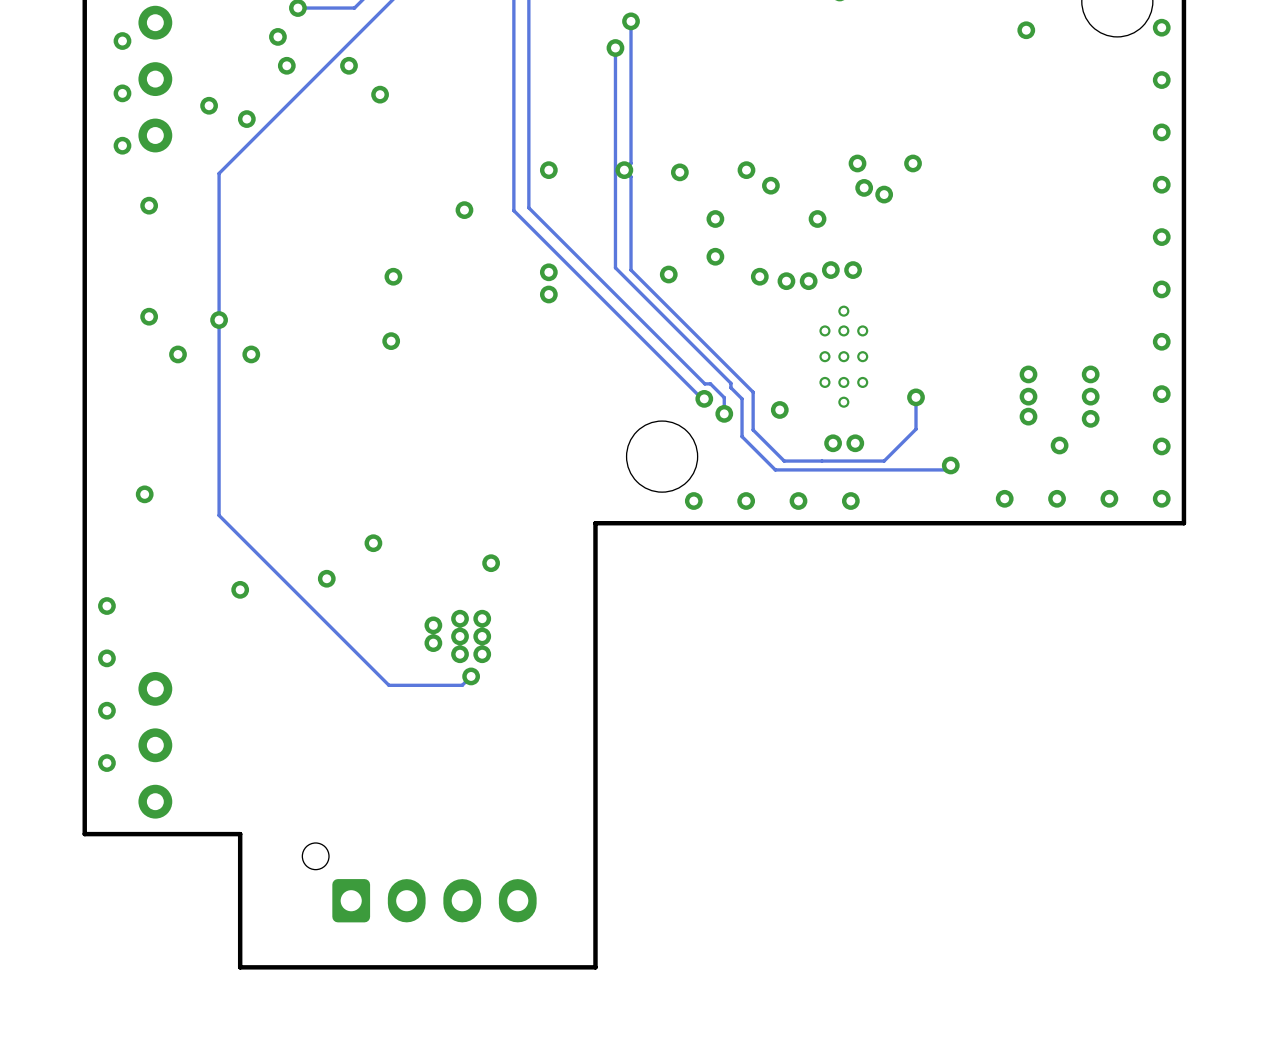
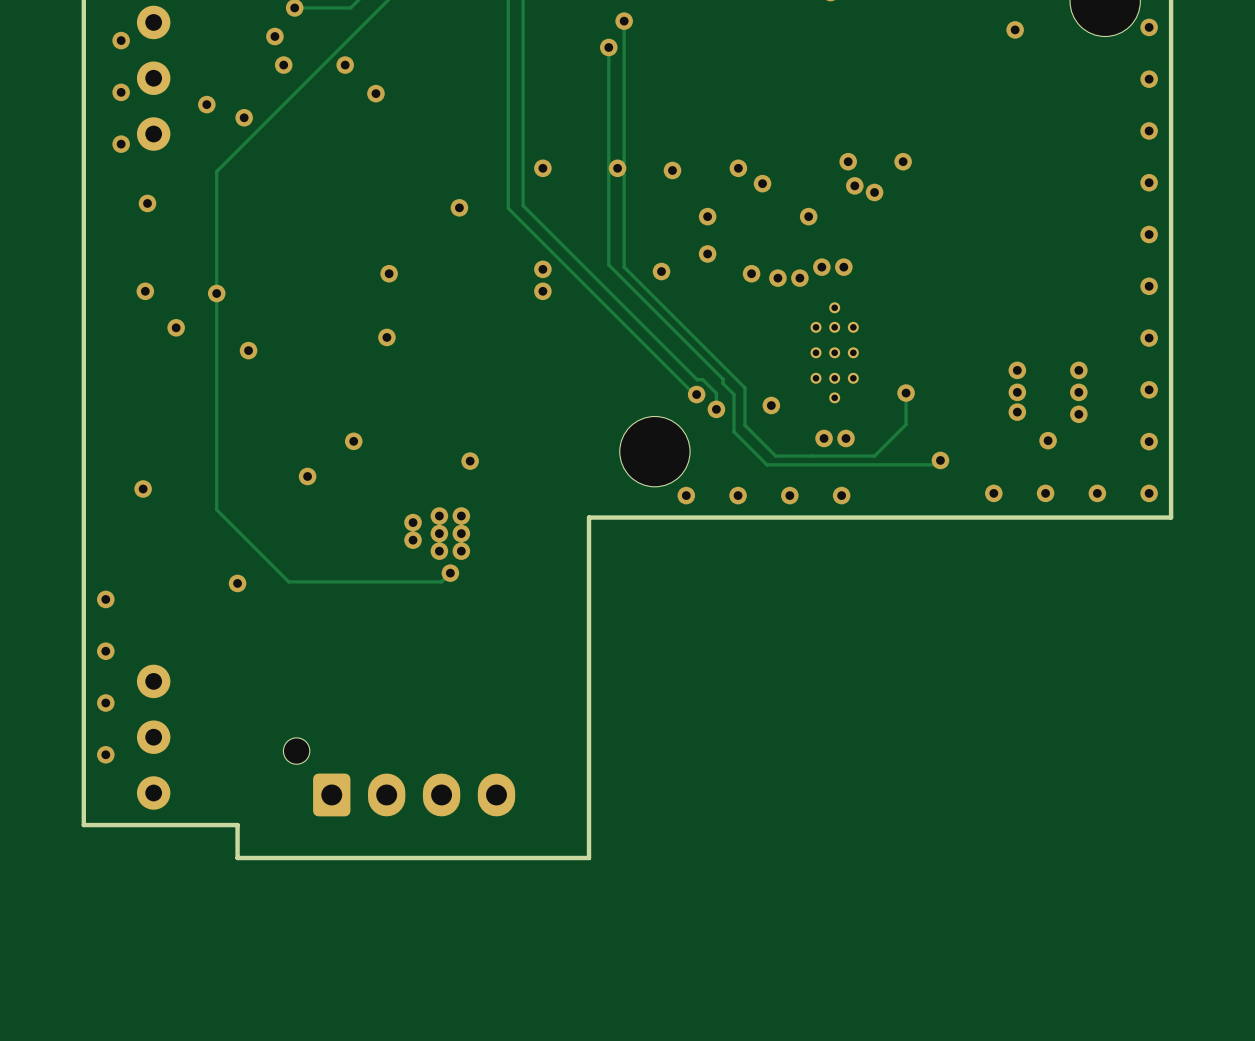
via: none -> (145, 291)
via: none -> (216, 293)
via: (149, 316) -> none
via: (219, 320) -> none
via: none -> (176, 327)
via: (178, 354) -> none
via: none -> (353, 441)
via: none -> (470, 461)
via: none -> (307, 476)
via: none -> (439, 516)
via: none -> (461, 516)
via: none -> (413, 522)
via: none -> (439, 533)
via: none -> (461, 533)
via: (373, 543) -> none
via: none -> (413, 540)
via: none -> (439, 551)
via: none -> (461, 551)
via: (491, 563) -> none
via: (326, 578) -> none
via: none -> (450, 573)
track: (291, 588) (388, 685) (462, 685) (471, 676) -> (288, 581) (441, 581) (450, 573)
via: (460, 618) -> none
via: (482, 618) -> none
via: (433, 625) -> none
via: (460, 636) -> none
via: (482, 636) -> none
via: (433, 643) -> none
via: (460, 654) -> none
via: (482, 654) -> none
via: (471, 676) -> none
board edge: (595, 867) (595, 967) (240, 967) (240, 867) -> (589, 858) (237, 858)
part position: (419, 882) -> (399, 777)

